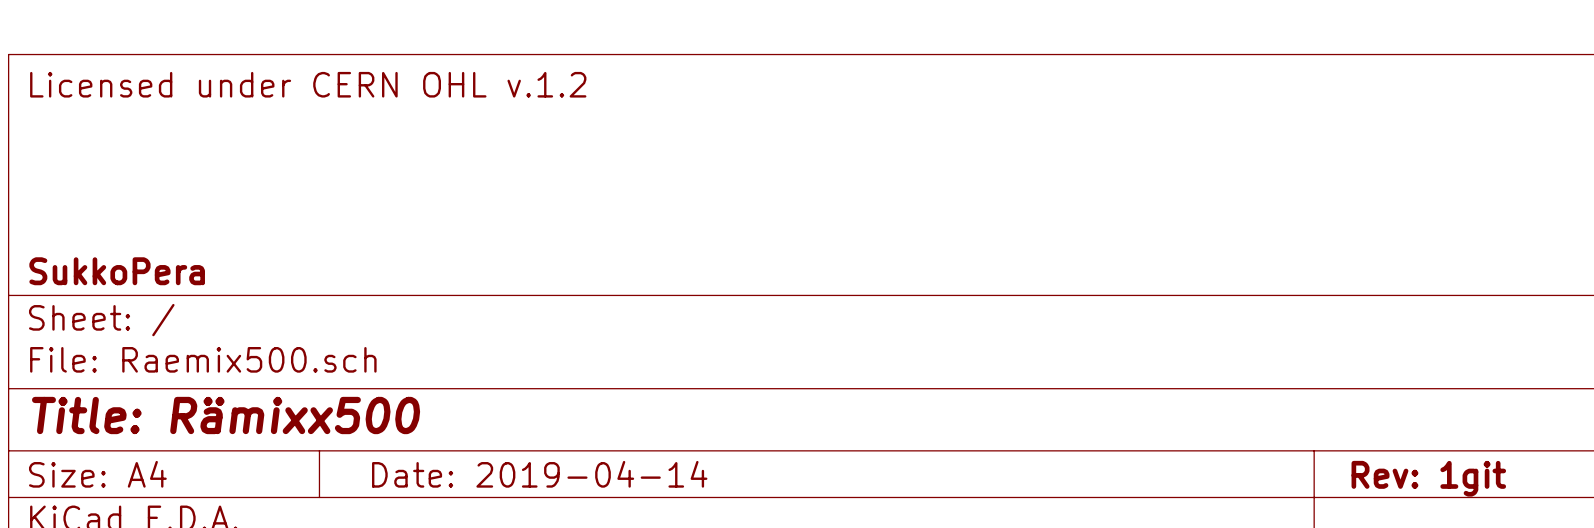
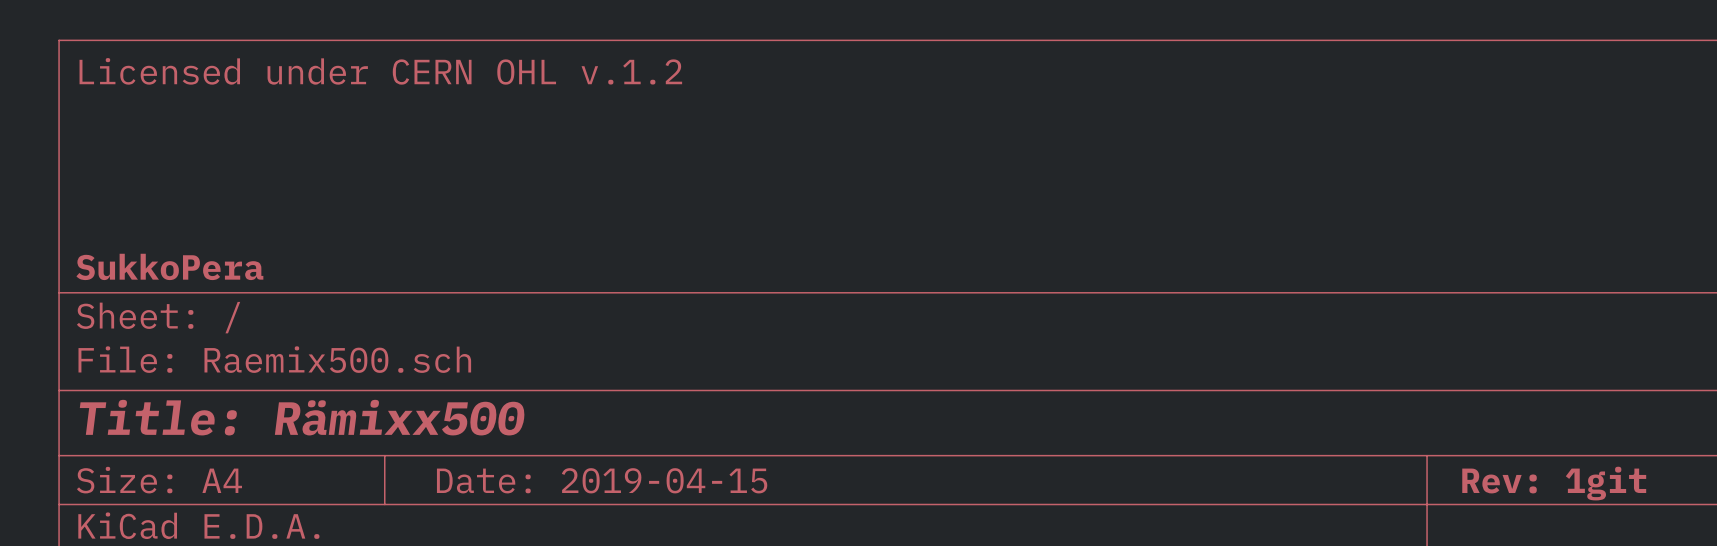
title block: Date: 2019-04-14 (539, 474) -> Date: 2019-04-15 (602, 480)

